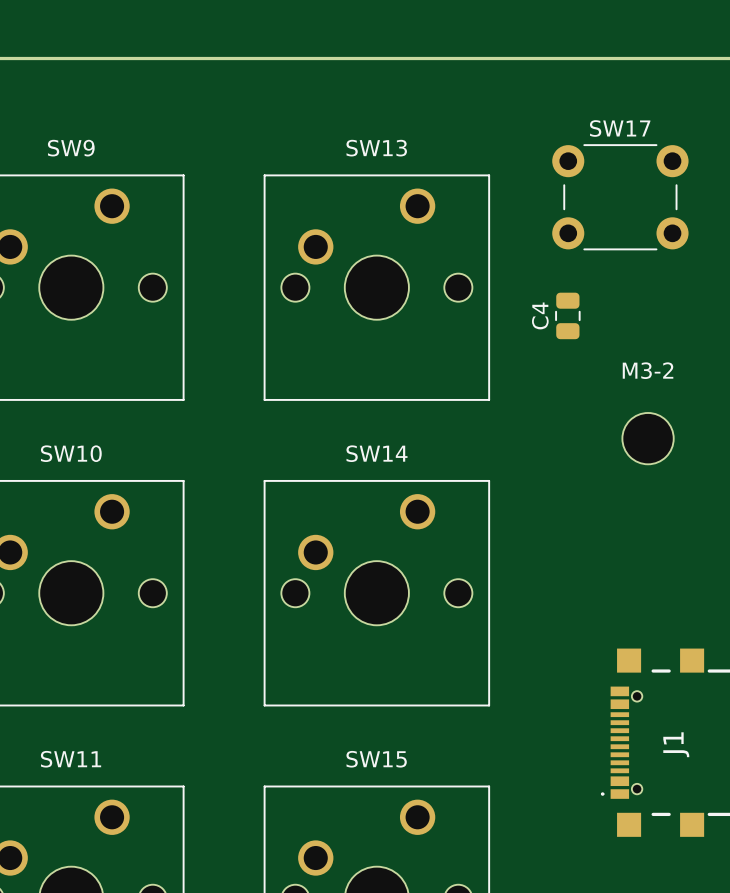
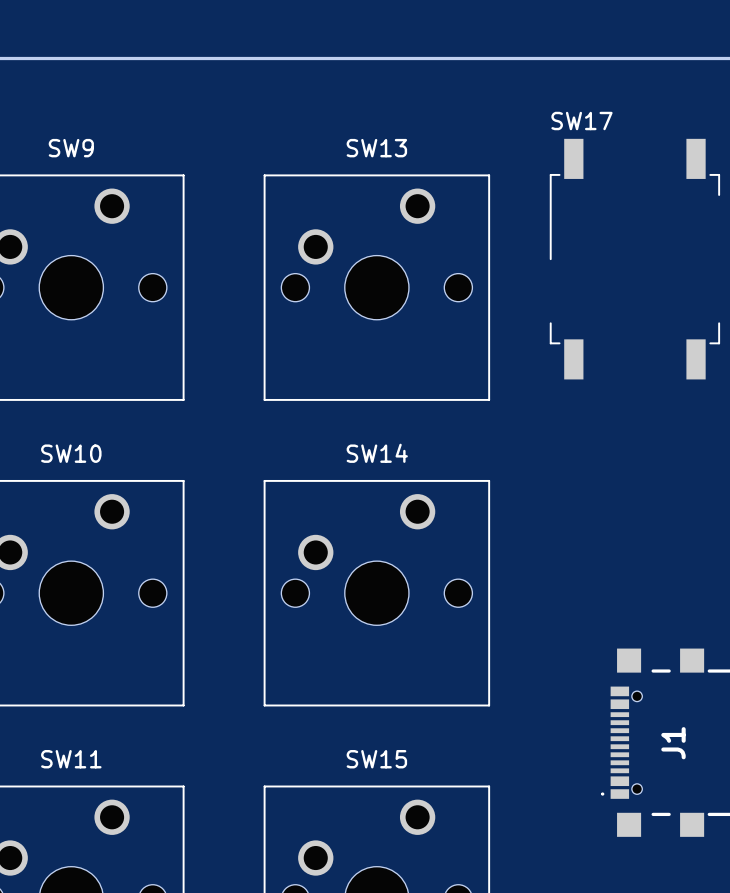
SW17 name position: SW17 (620, 128) -> SW17 (581, 121)
SW17 footprint: [552, 144, 689, 251] -> [549, 138, 721, 380]
C4: (567, 315) -> none
M3-2: (648, 438) -> none

